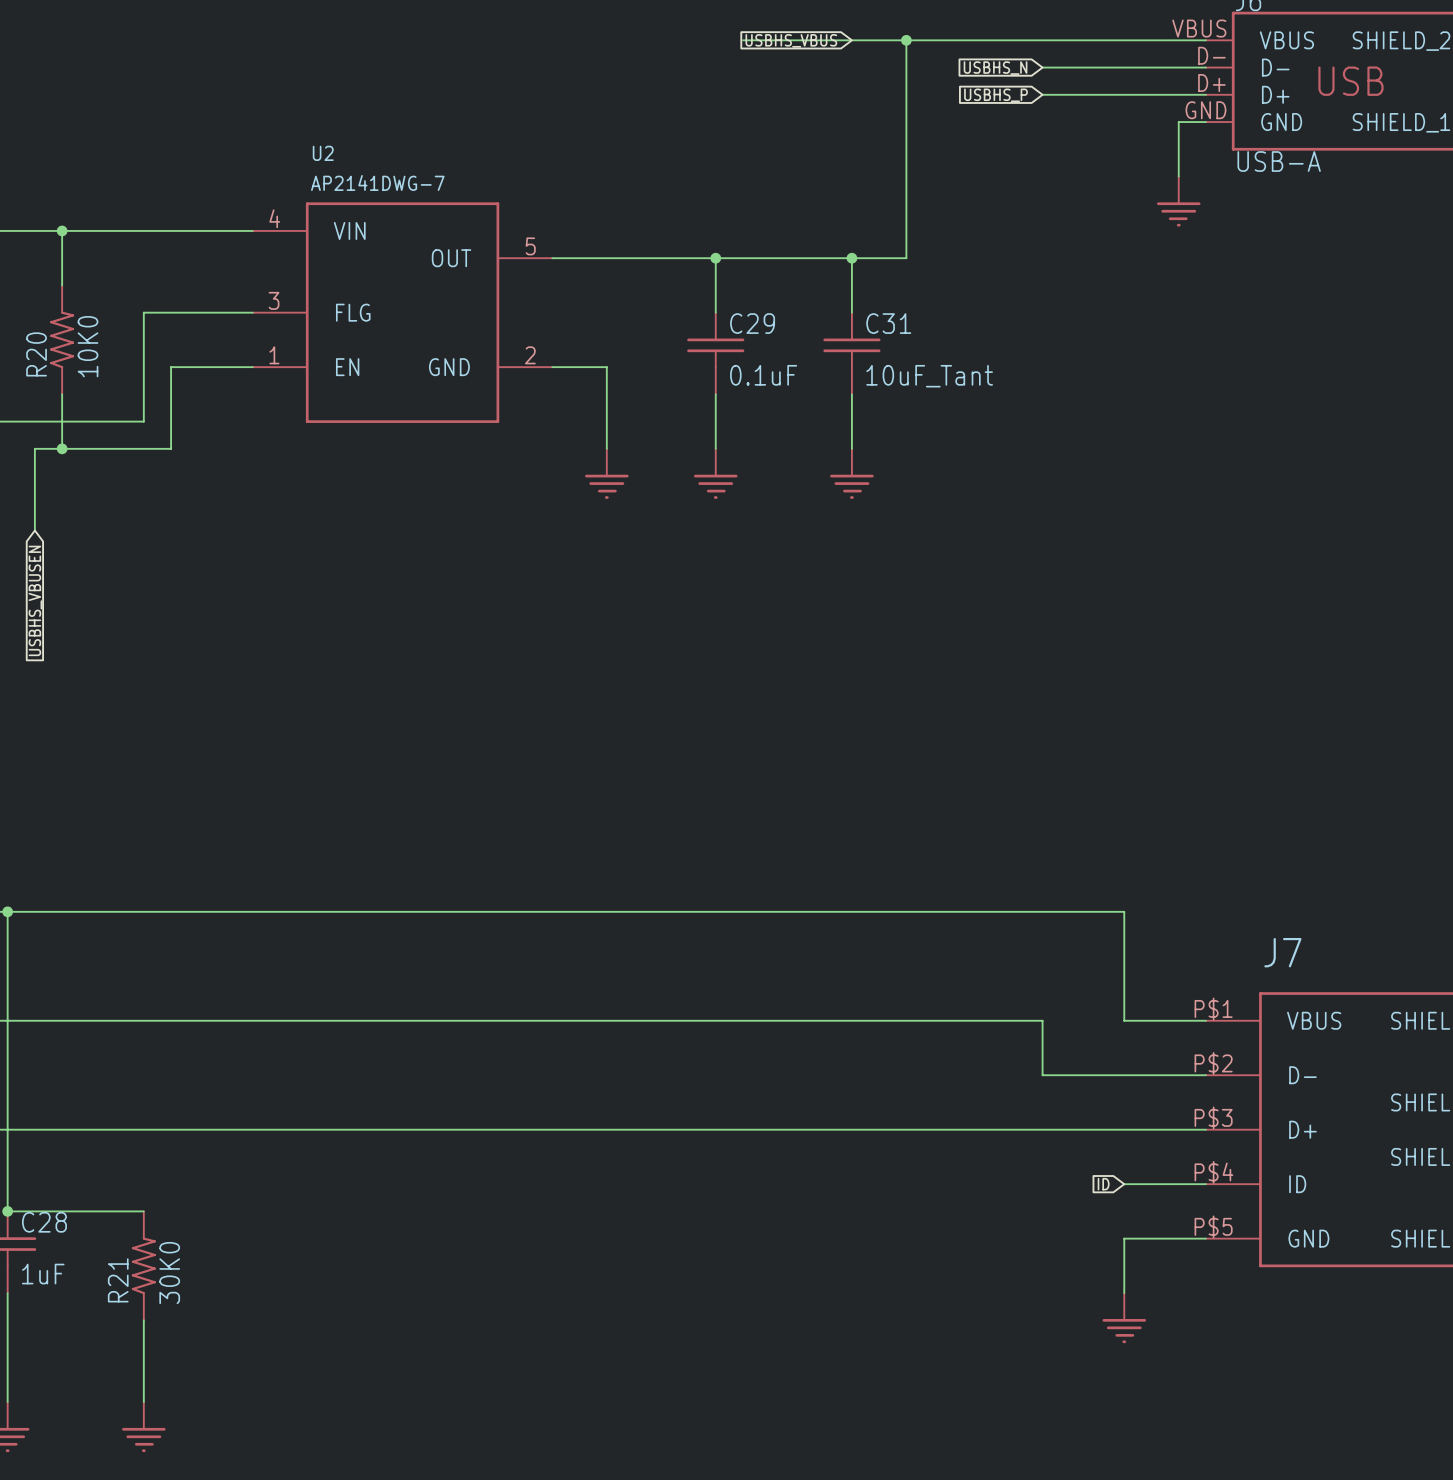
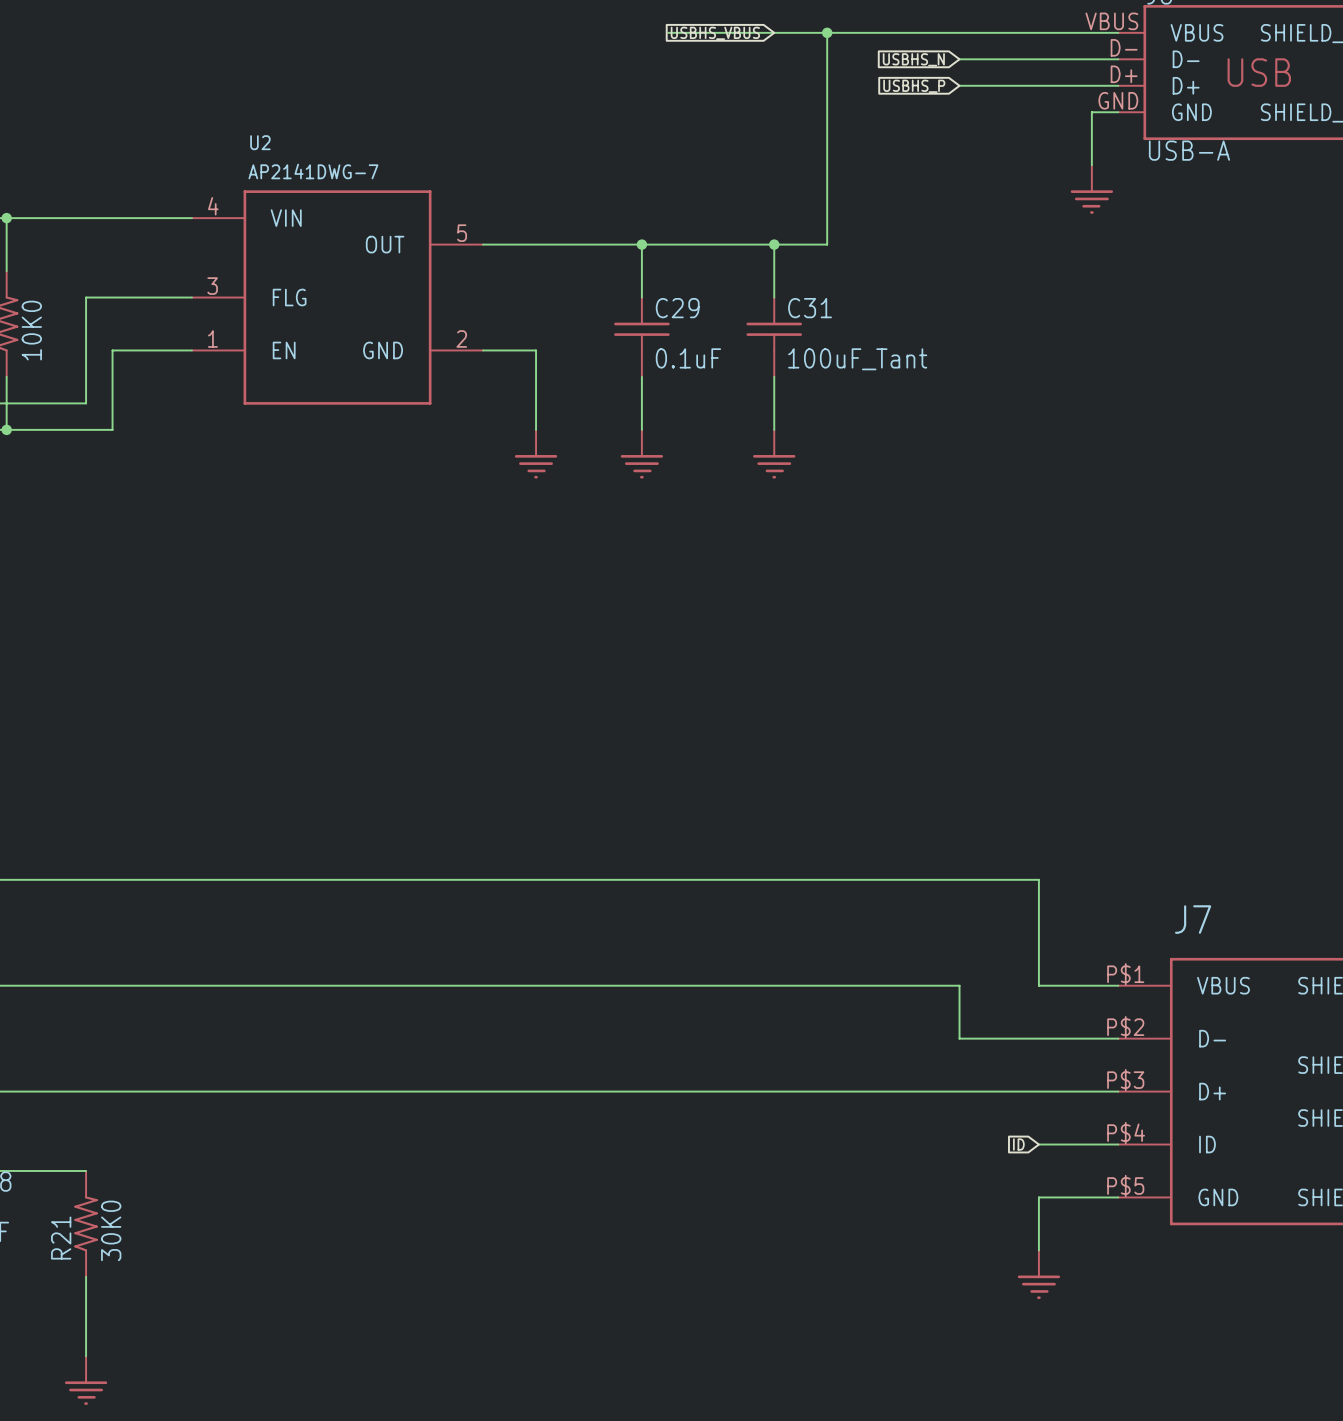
C31 value: 10uF_Tant (929, 376) -> 100uF_Tant (857, 359)

